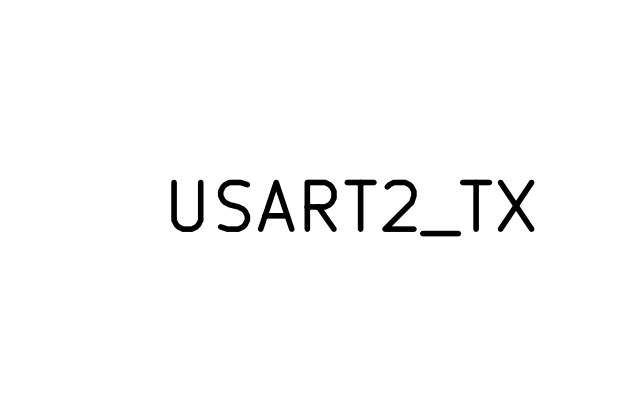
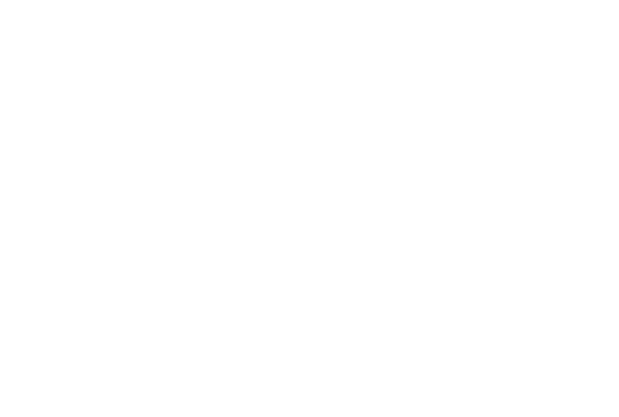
label: USART2_TX (352, 208) -> none

